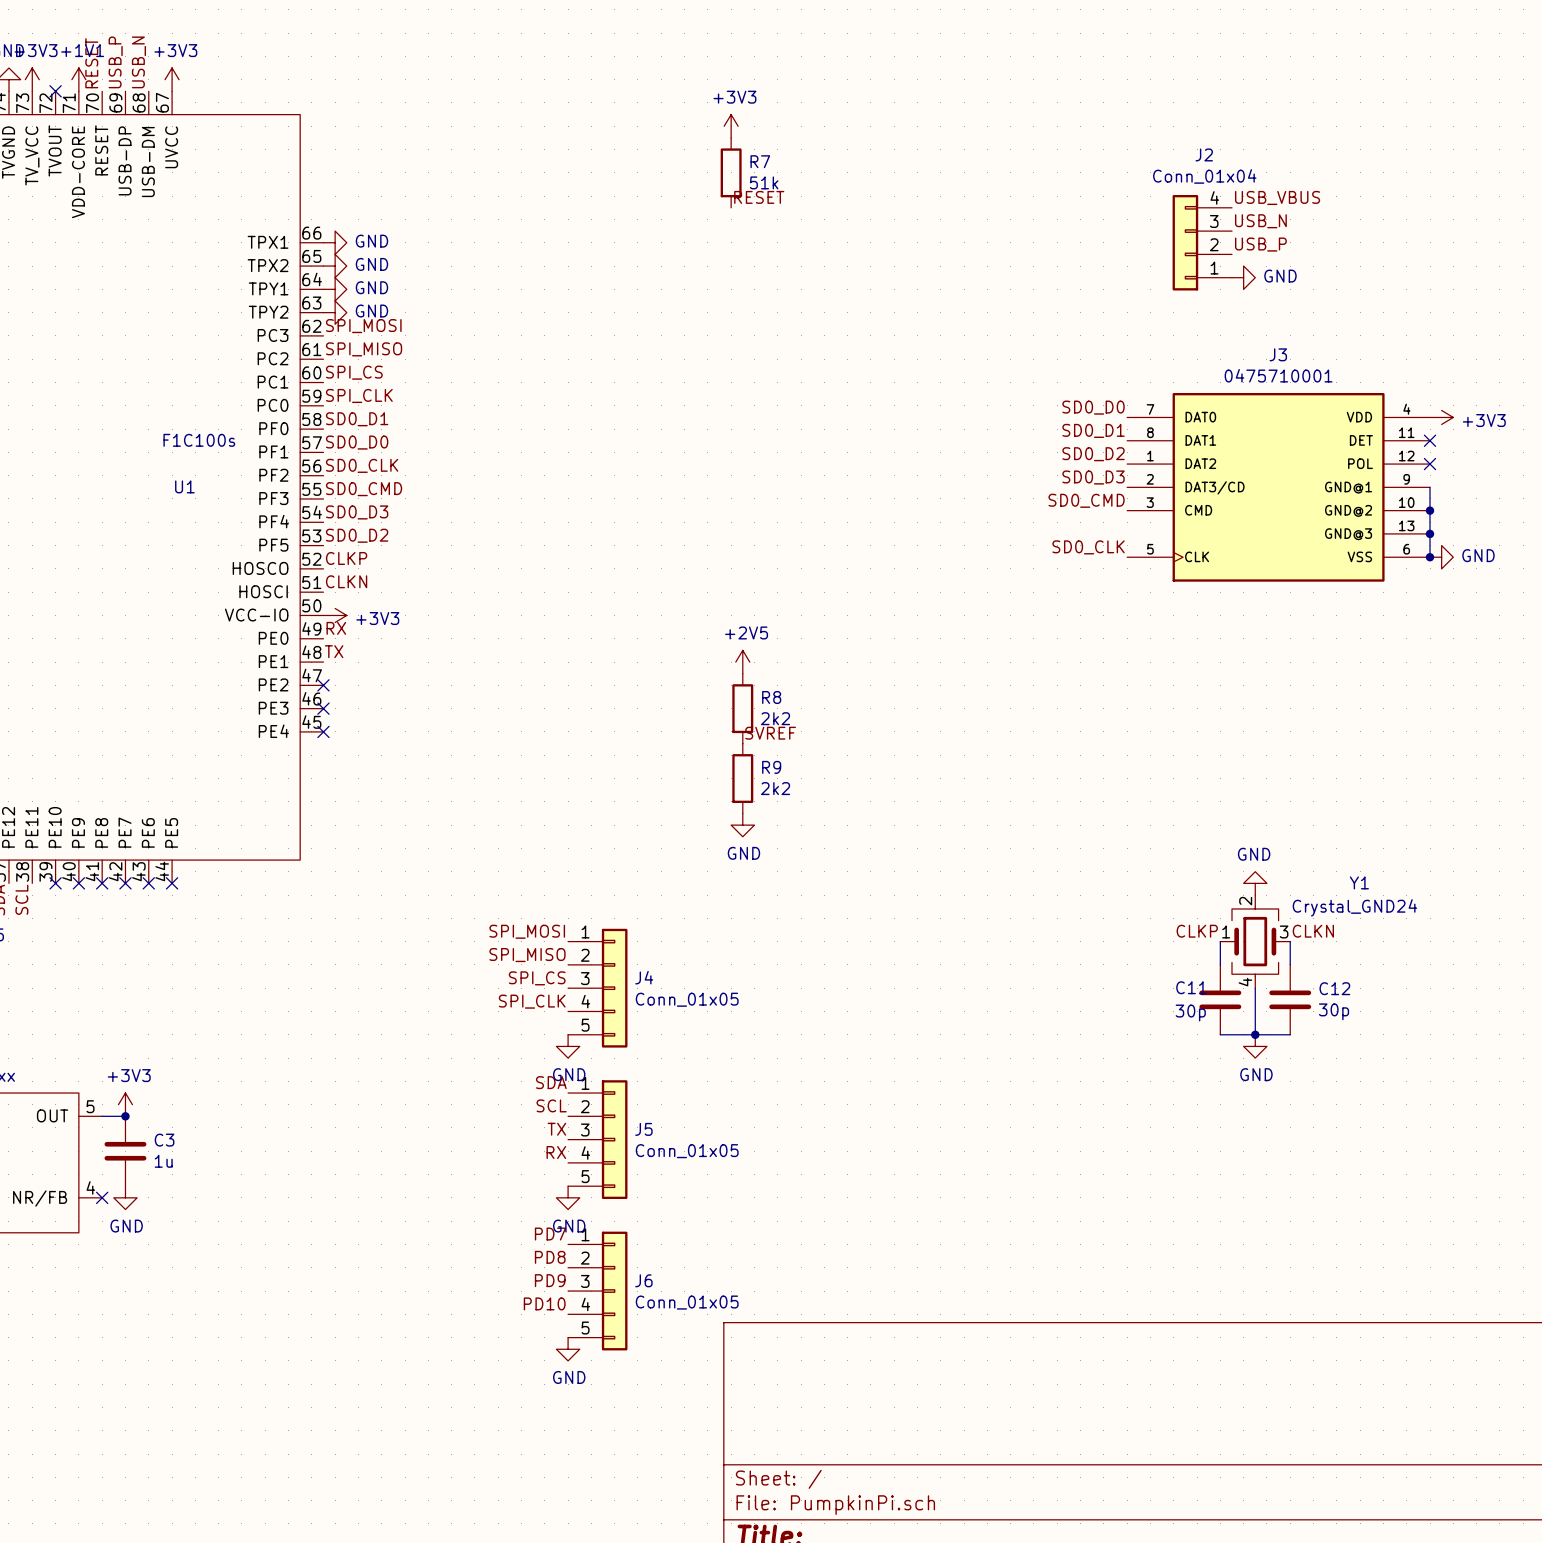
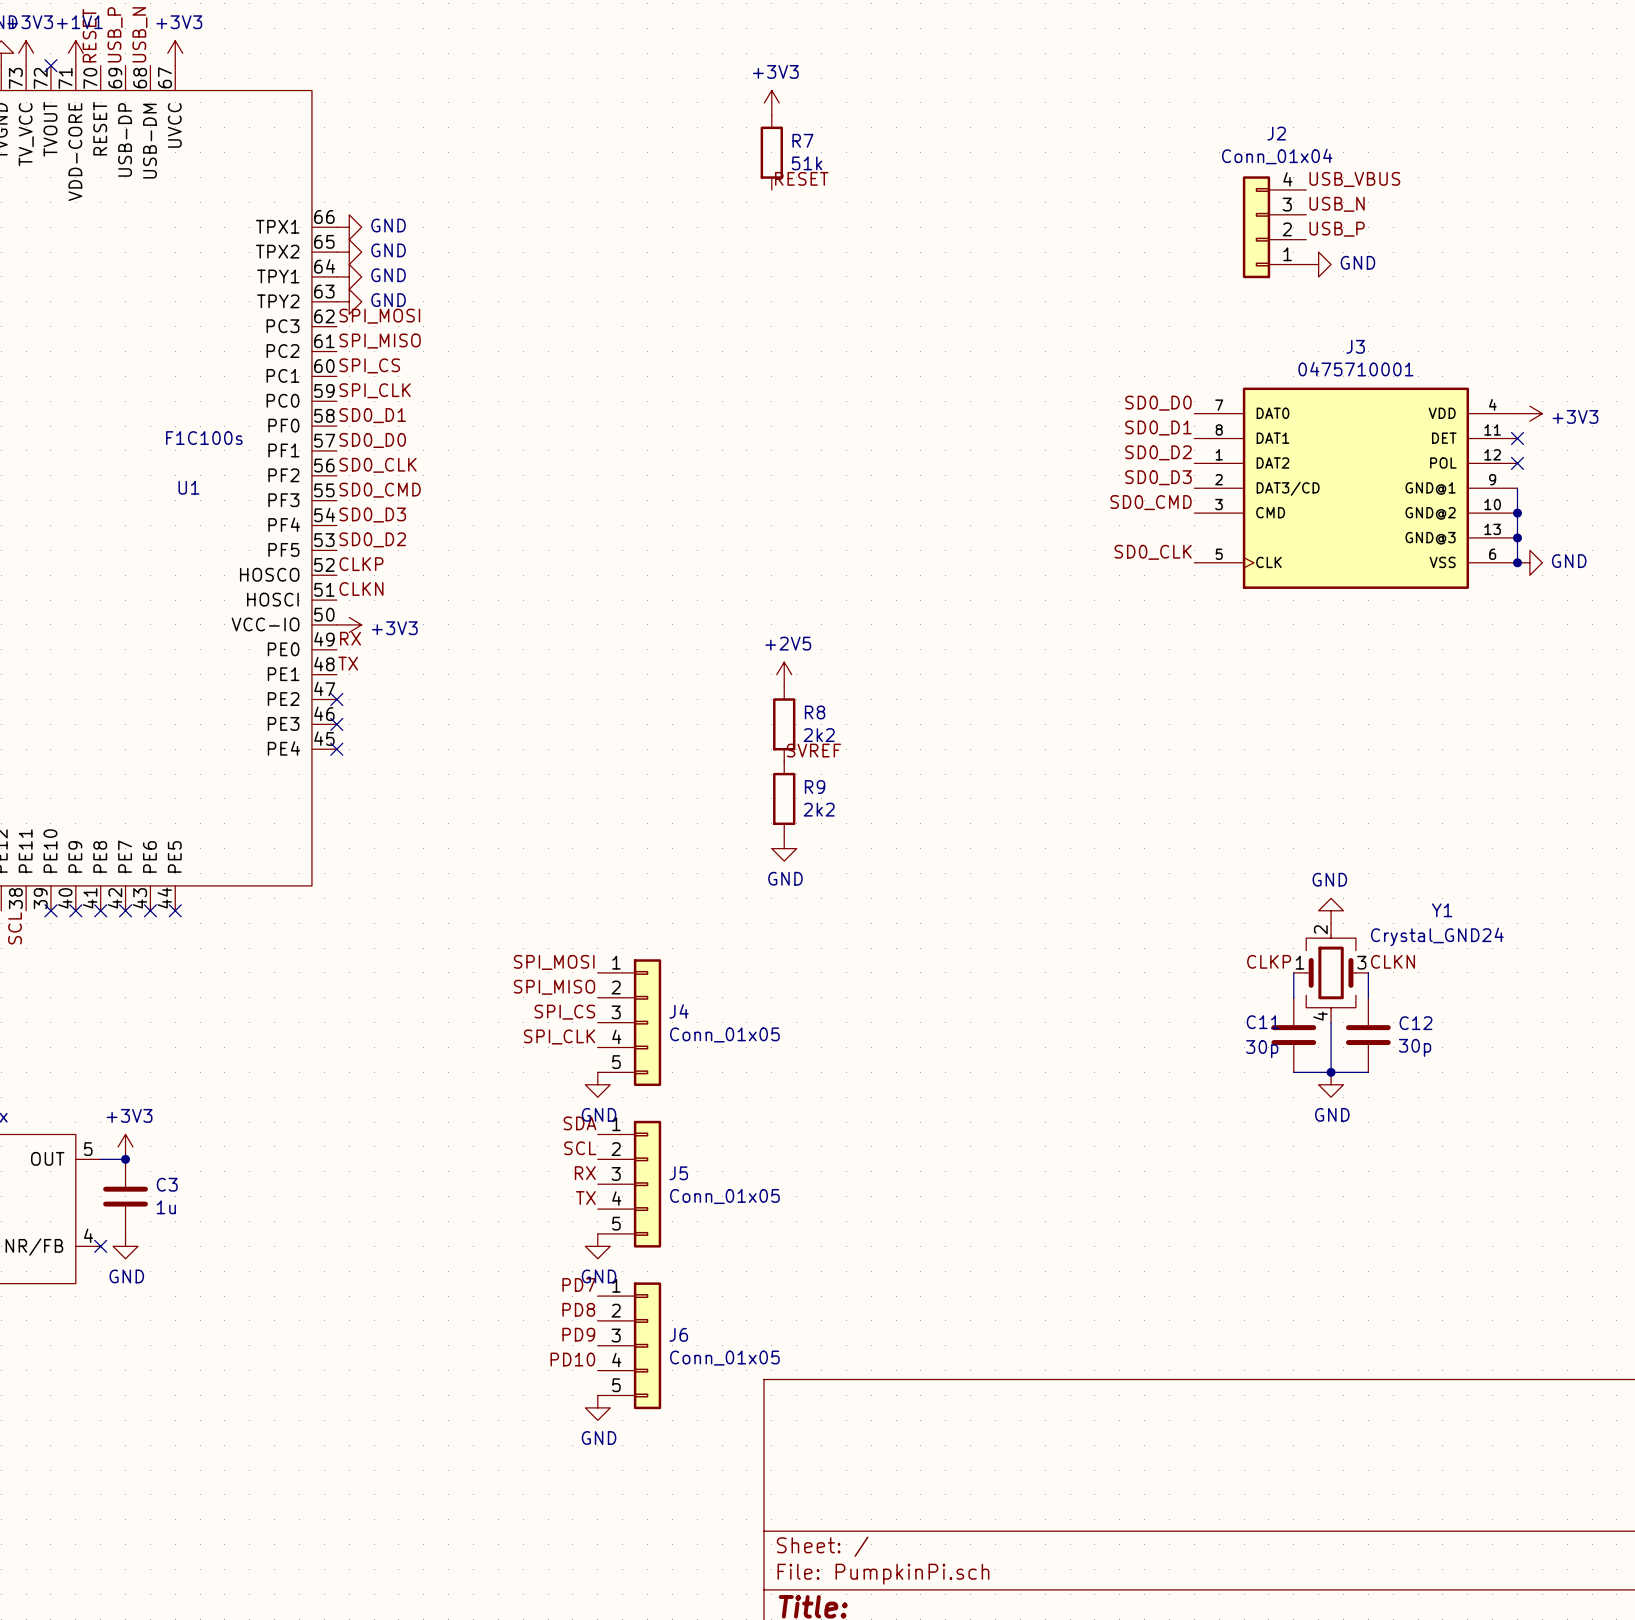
label: TX (556, 1129) -> RX (585, 1173)
label: RX (556, 1152) -> TX (585, 1197)

